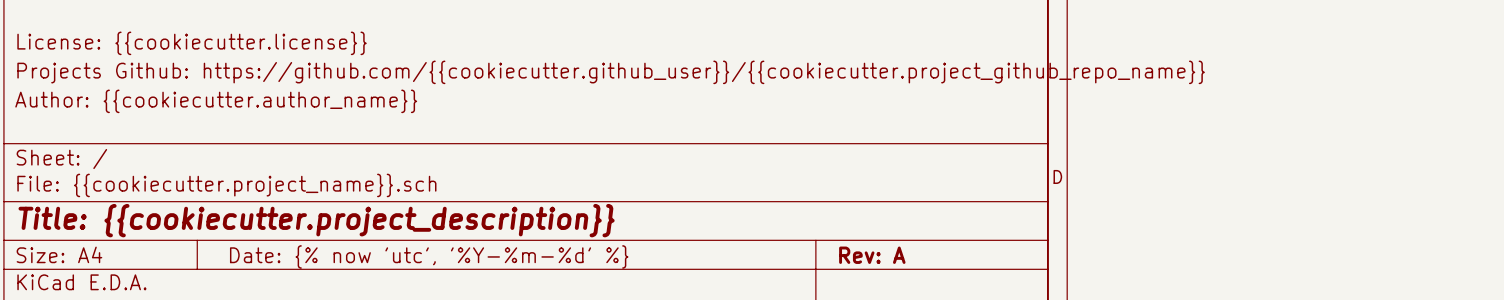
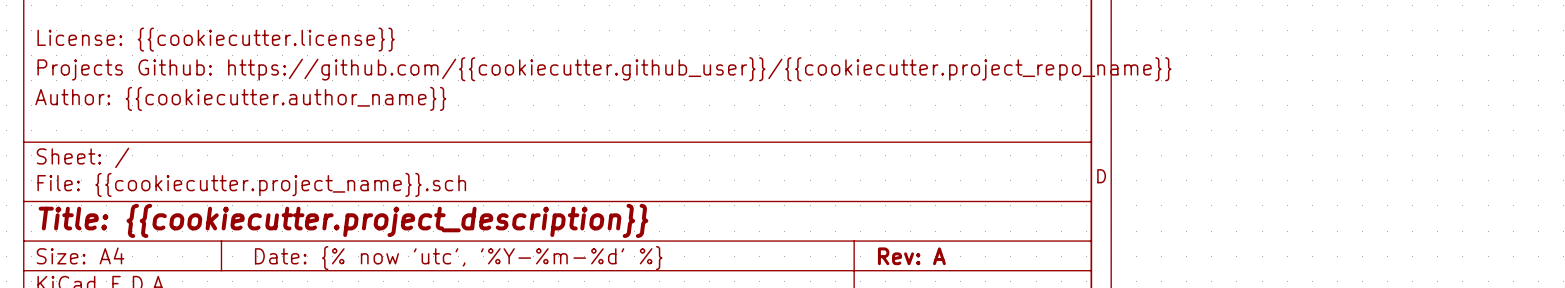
title block: Projects Github: https://github.com/{{cookiecutter.github_user}}/{{cookiecutter.project_github_repo_name}} (611, 72) -> Projects Github: https://github.com/{{cookiecutter.github_user}}/{{cookiecutter.project_repo_name}} (604, 69)

